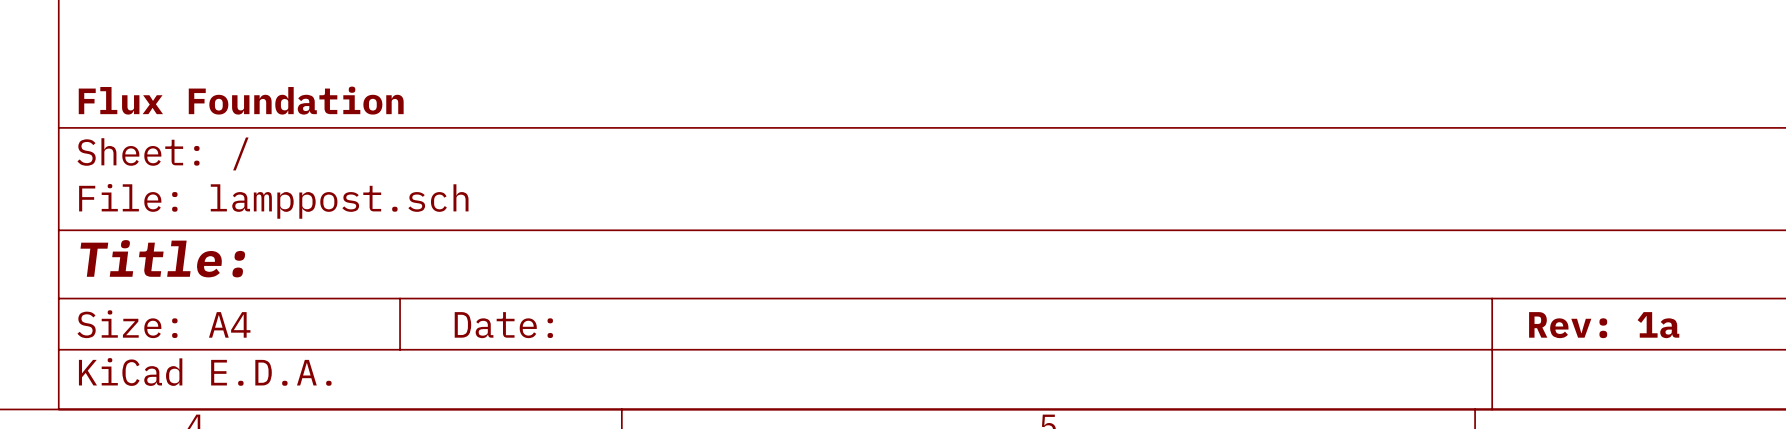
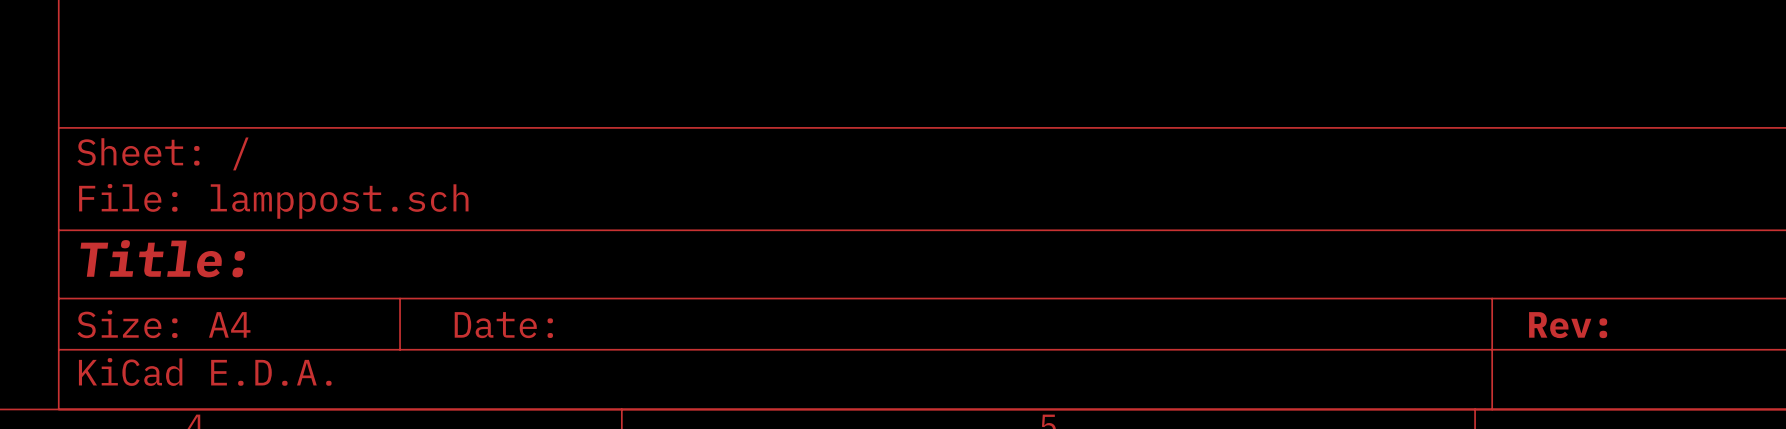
title block: Flux Foundation (241, 100) -> none
title block: Rev: 1a (1604, 325) -> Rev: (1568, 325)

